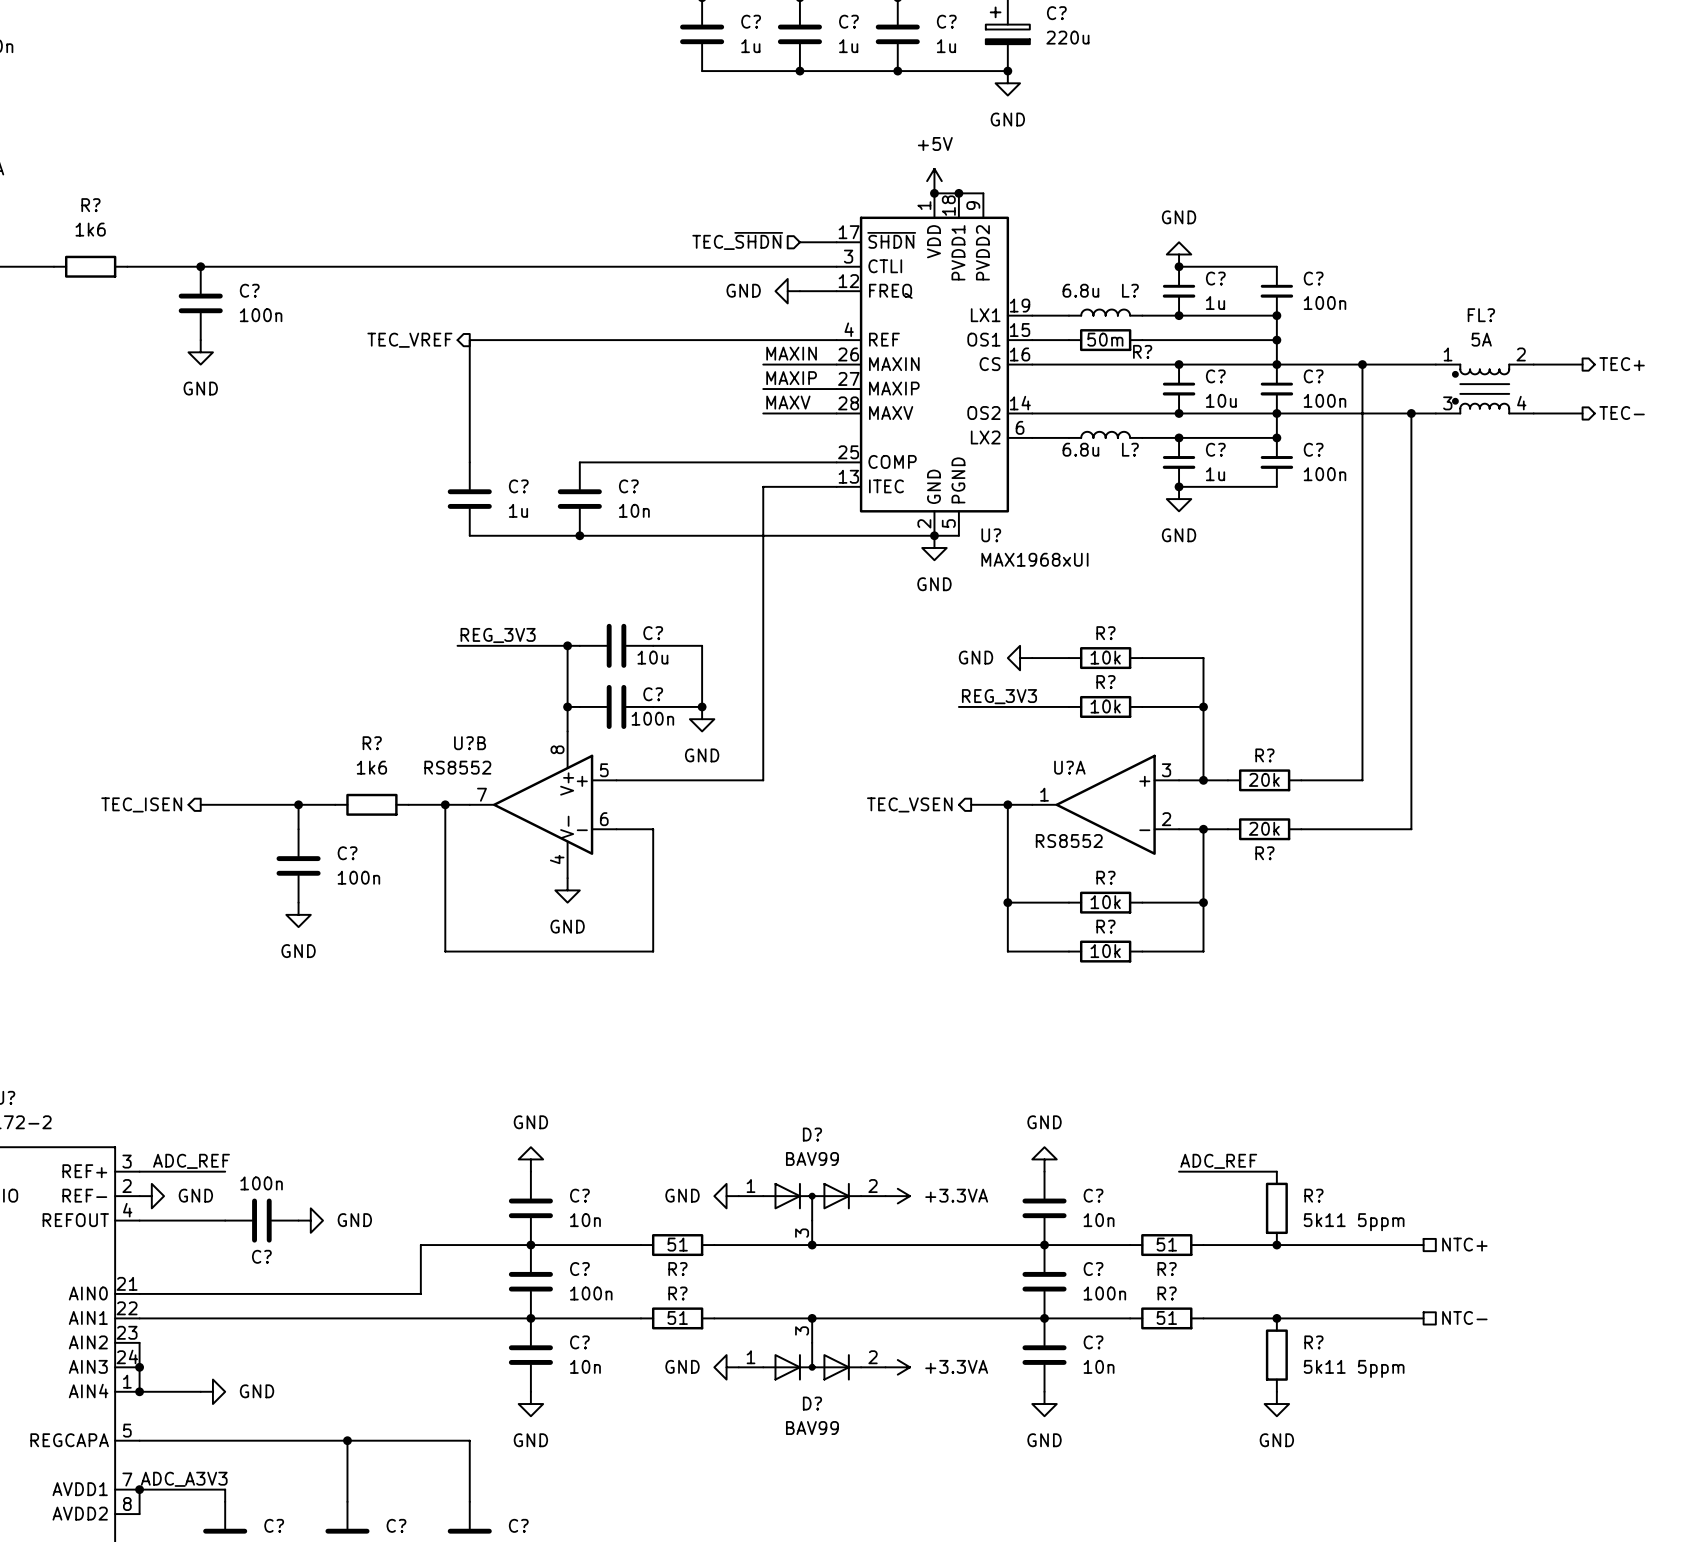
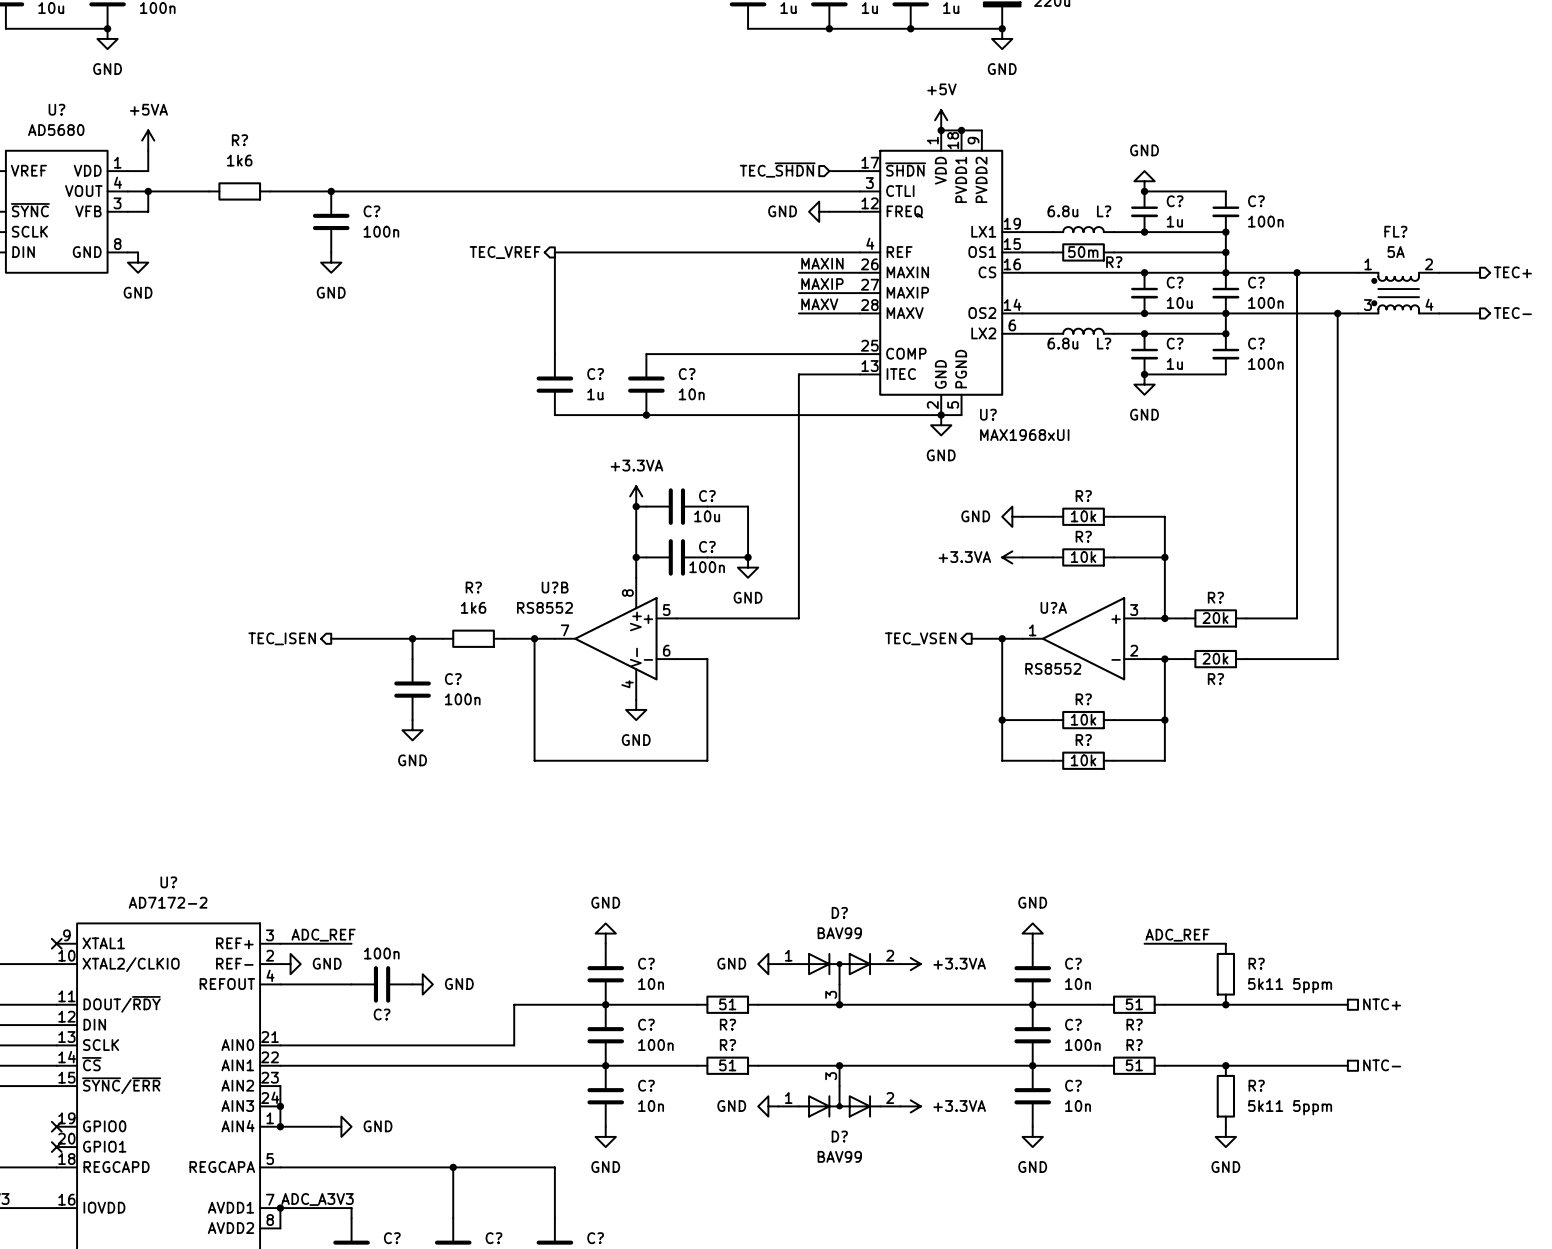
power symbol: none -> +3.3VA (636, 496)
label: REG_3V3 (498, 635) -> none
wire: (457, 645) (567, 645) -> none
label: REG_3V3 (999, 696) -> none
wire: (958, 706) (1032, 706) -> none
power symbol: none -> +3.3VA (1012, 557)

